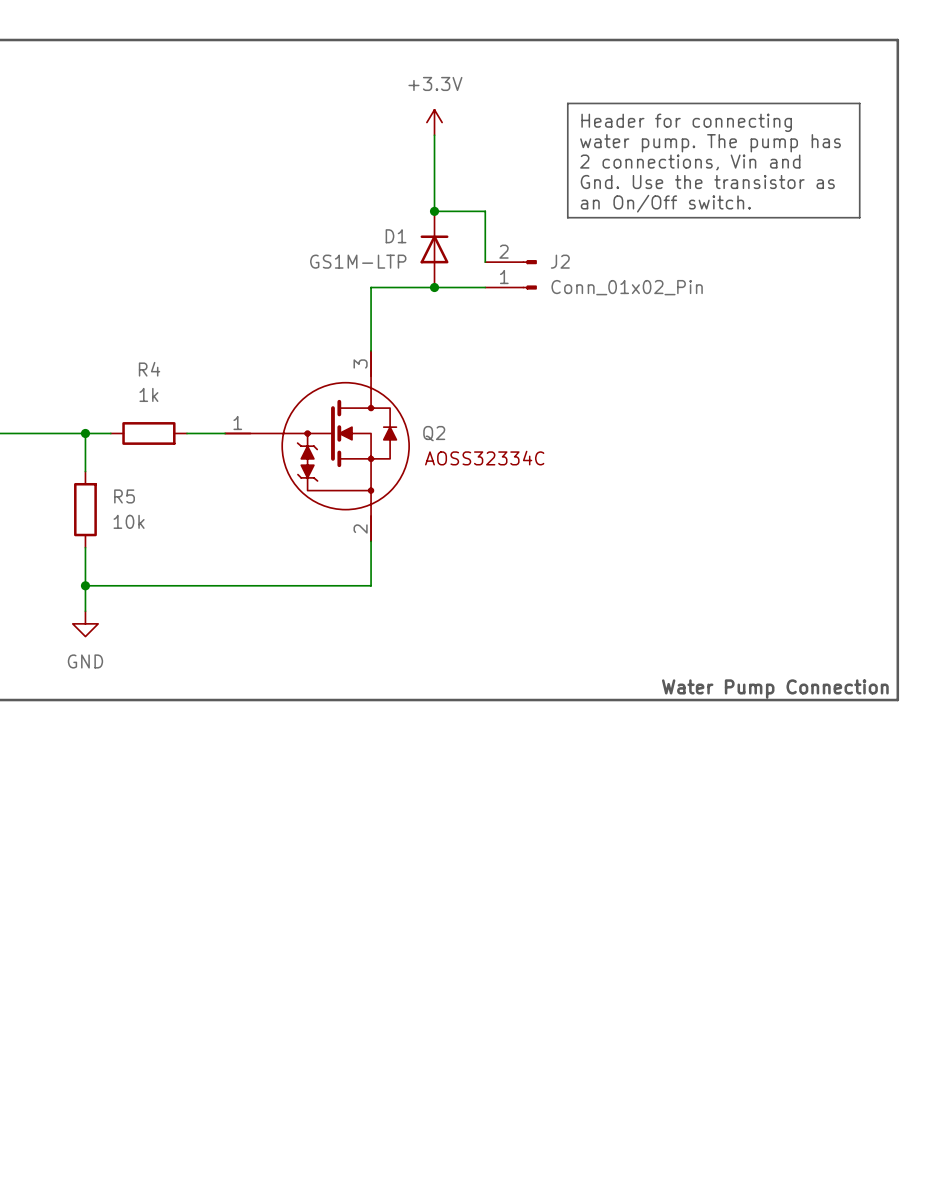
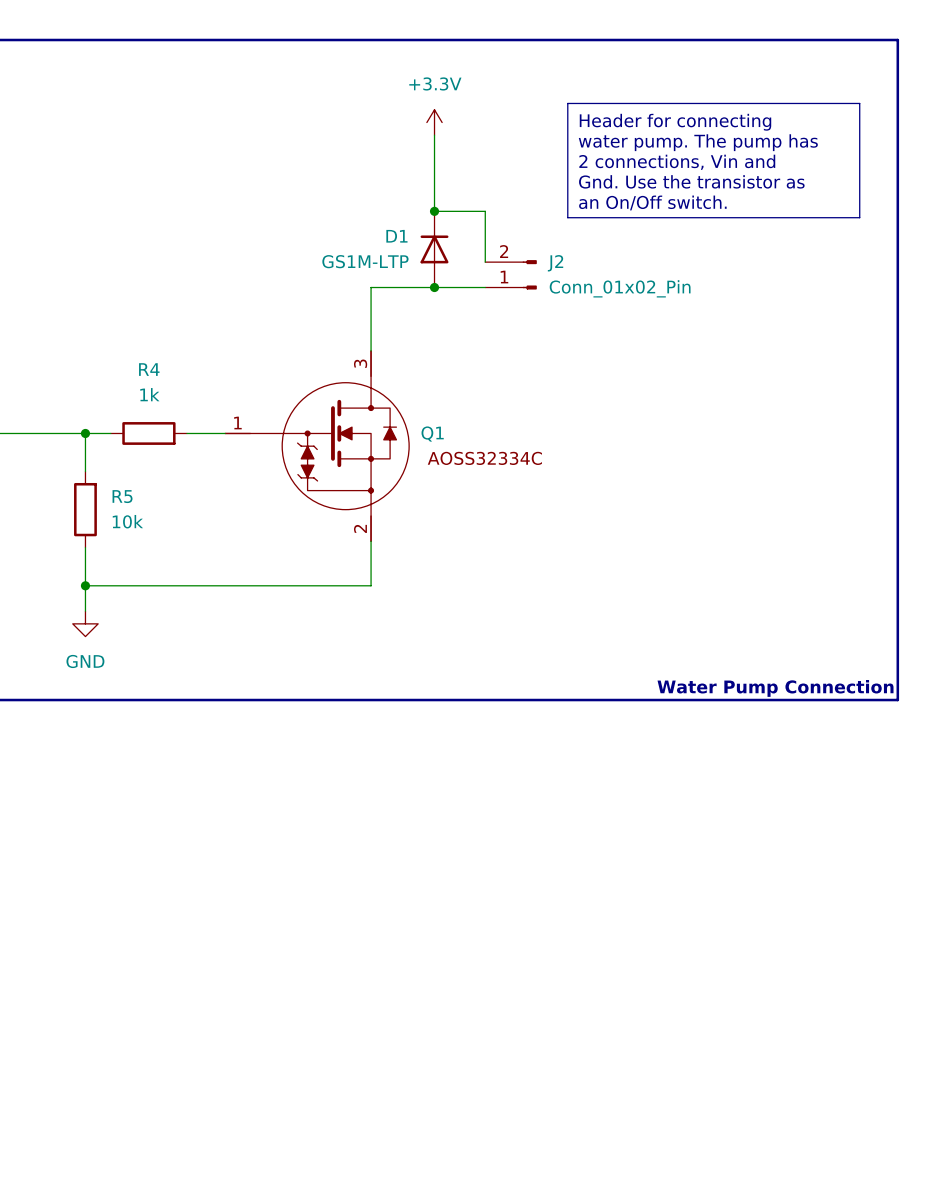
Q2 name: Q2 (434, 433) -> Q1 (432, 434)

